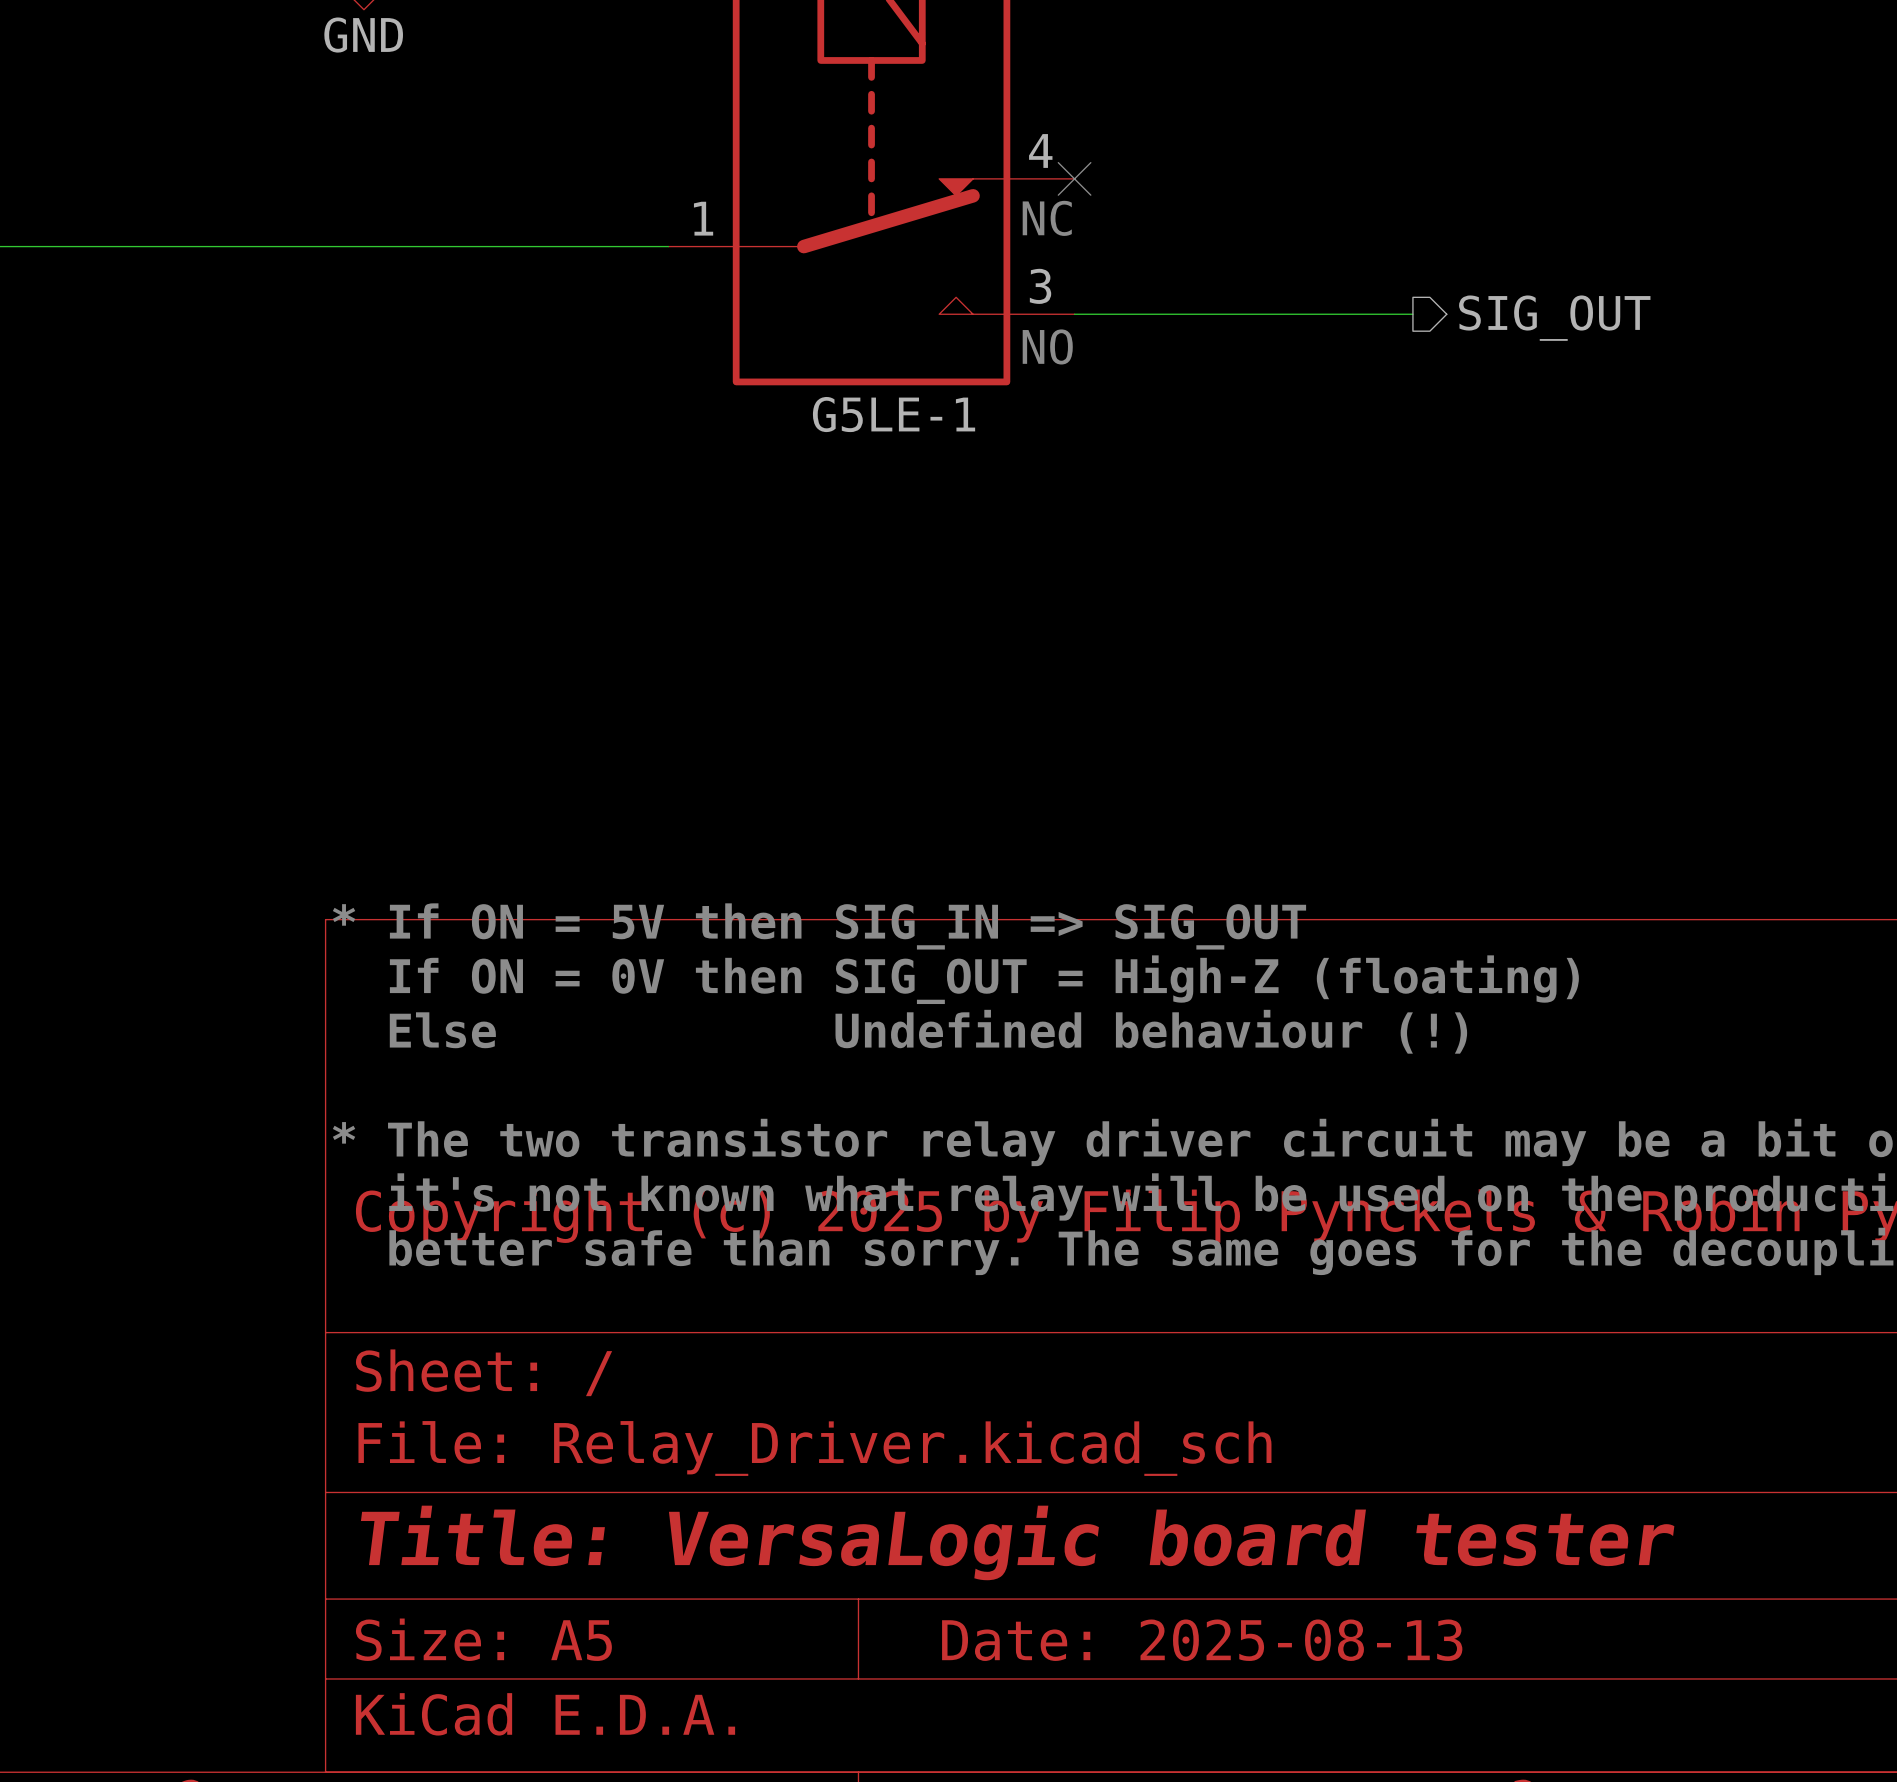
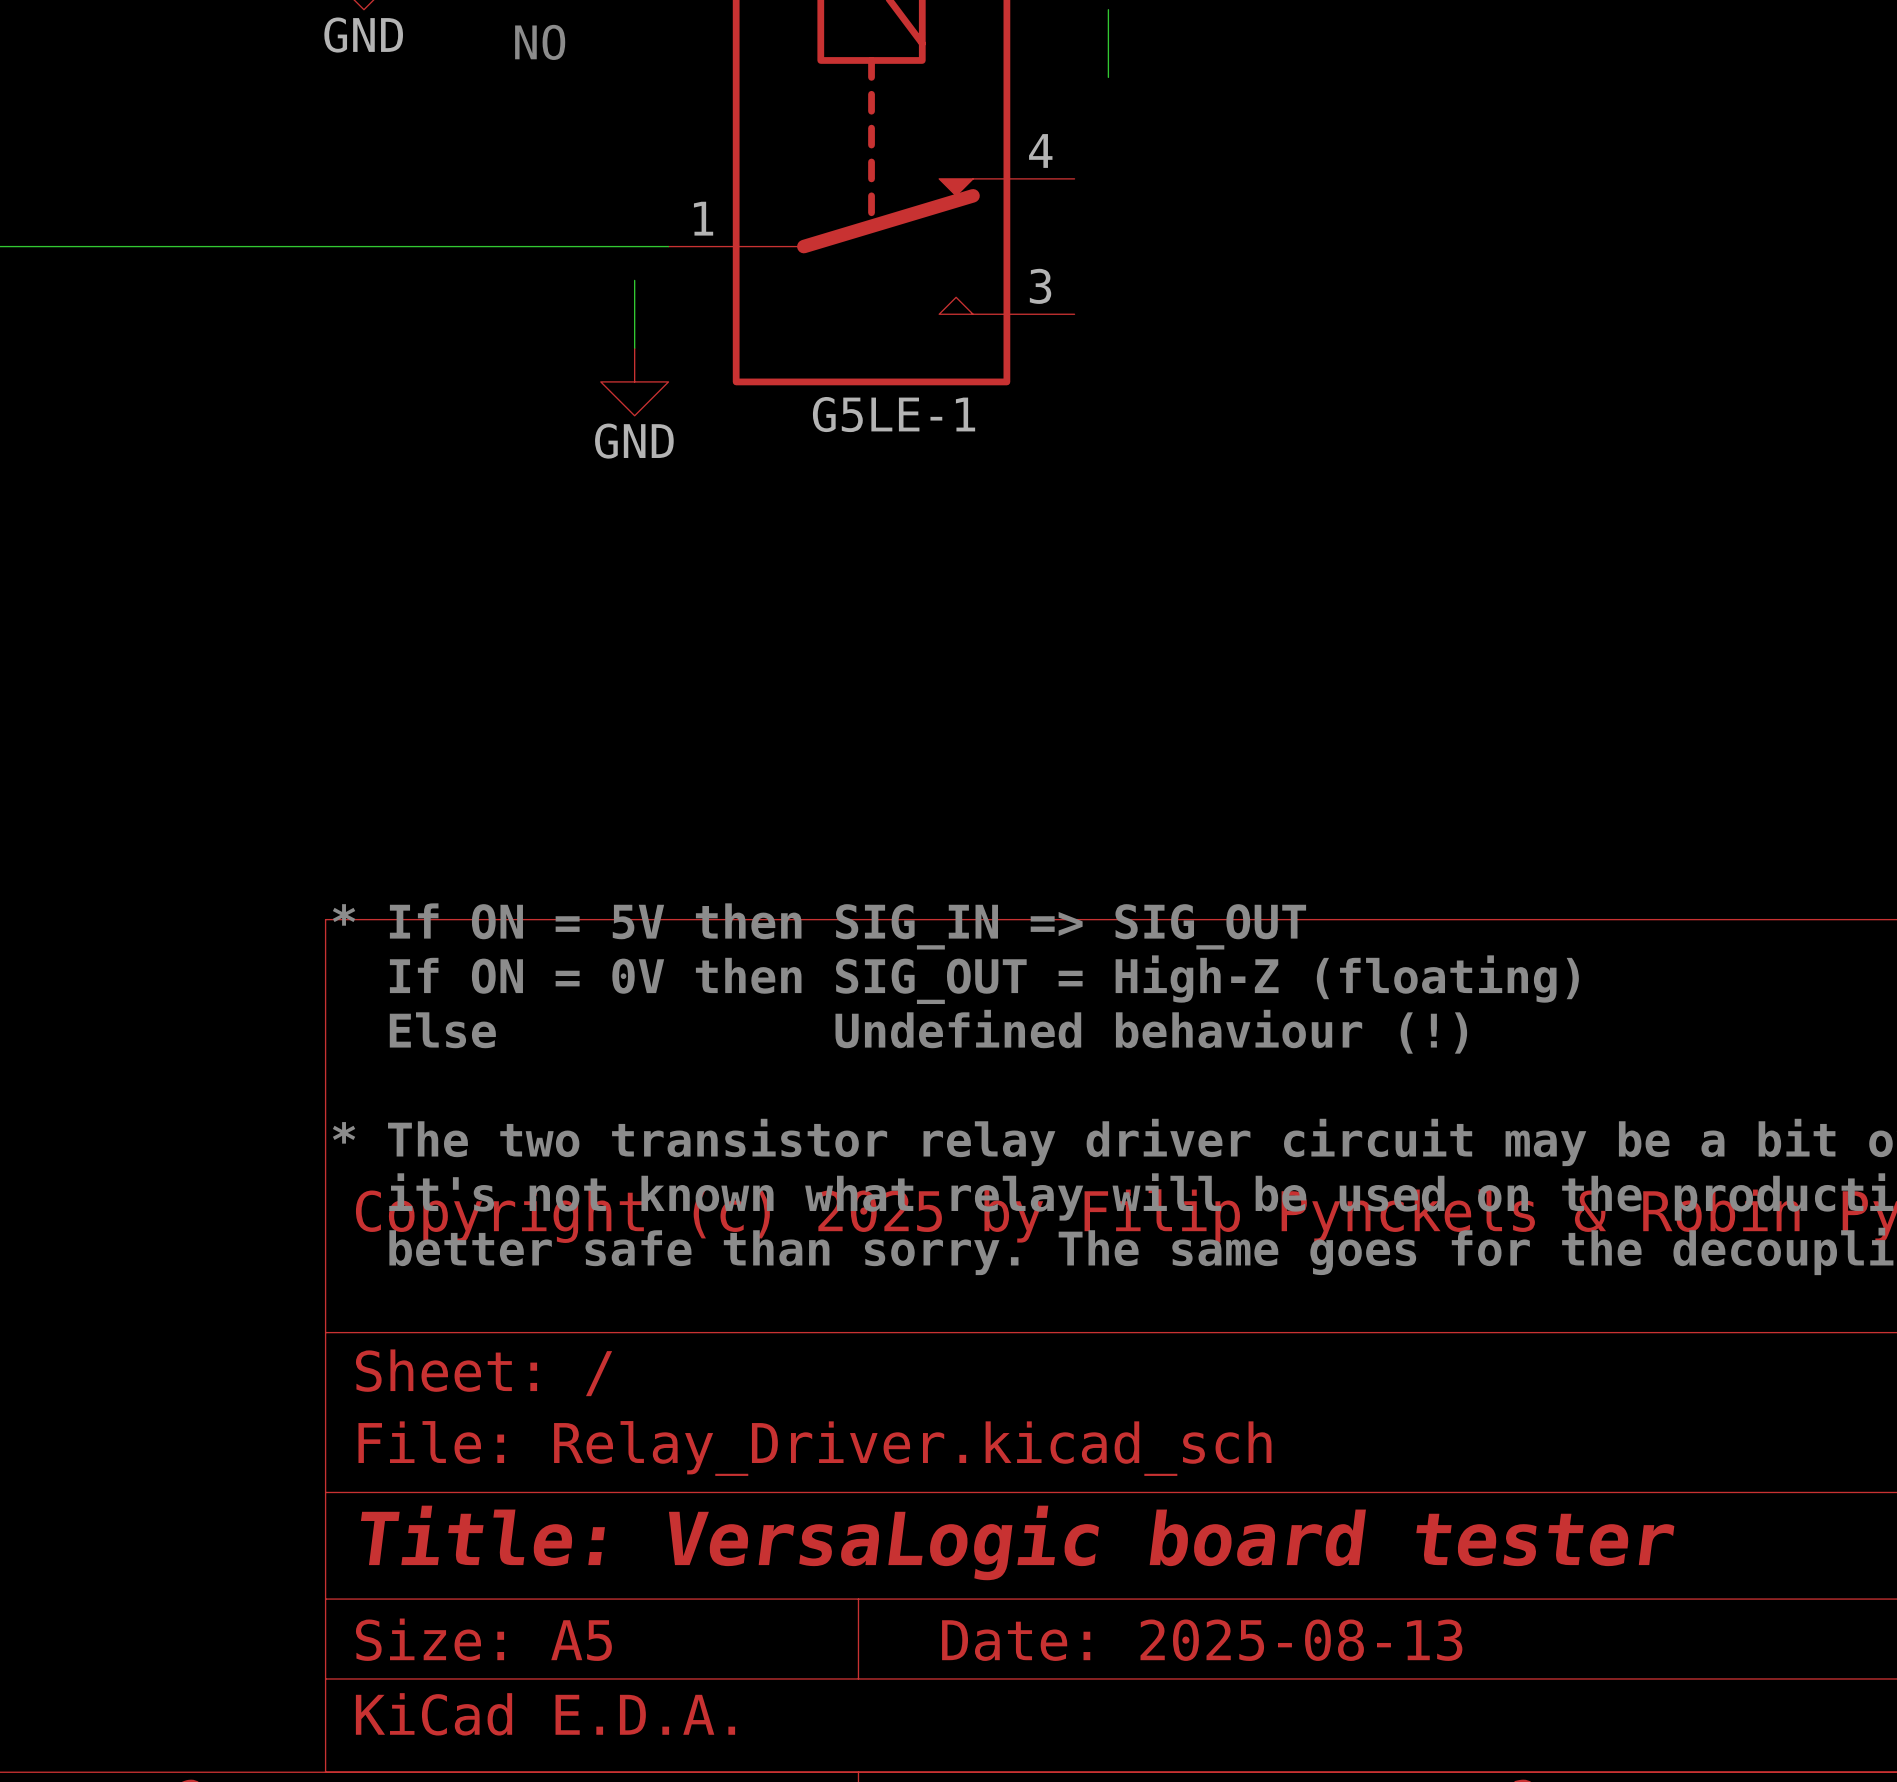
wire: none -> (1108, 9) (1108, 77)
no-connect mark: (1074, 178) -> none
text: NC (1047, 218) -> none
wire: none -> (634, 280) (634, 348)
wire: (1074, 314) (1412, 314) -> none
hierarchical label: SIG_OUT (1554, 318) -> none
text position: NO (1047, 346) -> NO (540, 42)
power symbol: none -> GND (634, 381)

